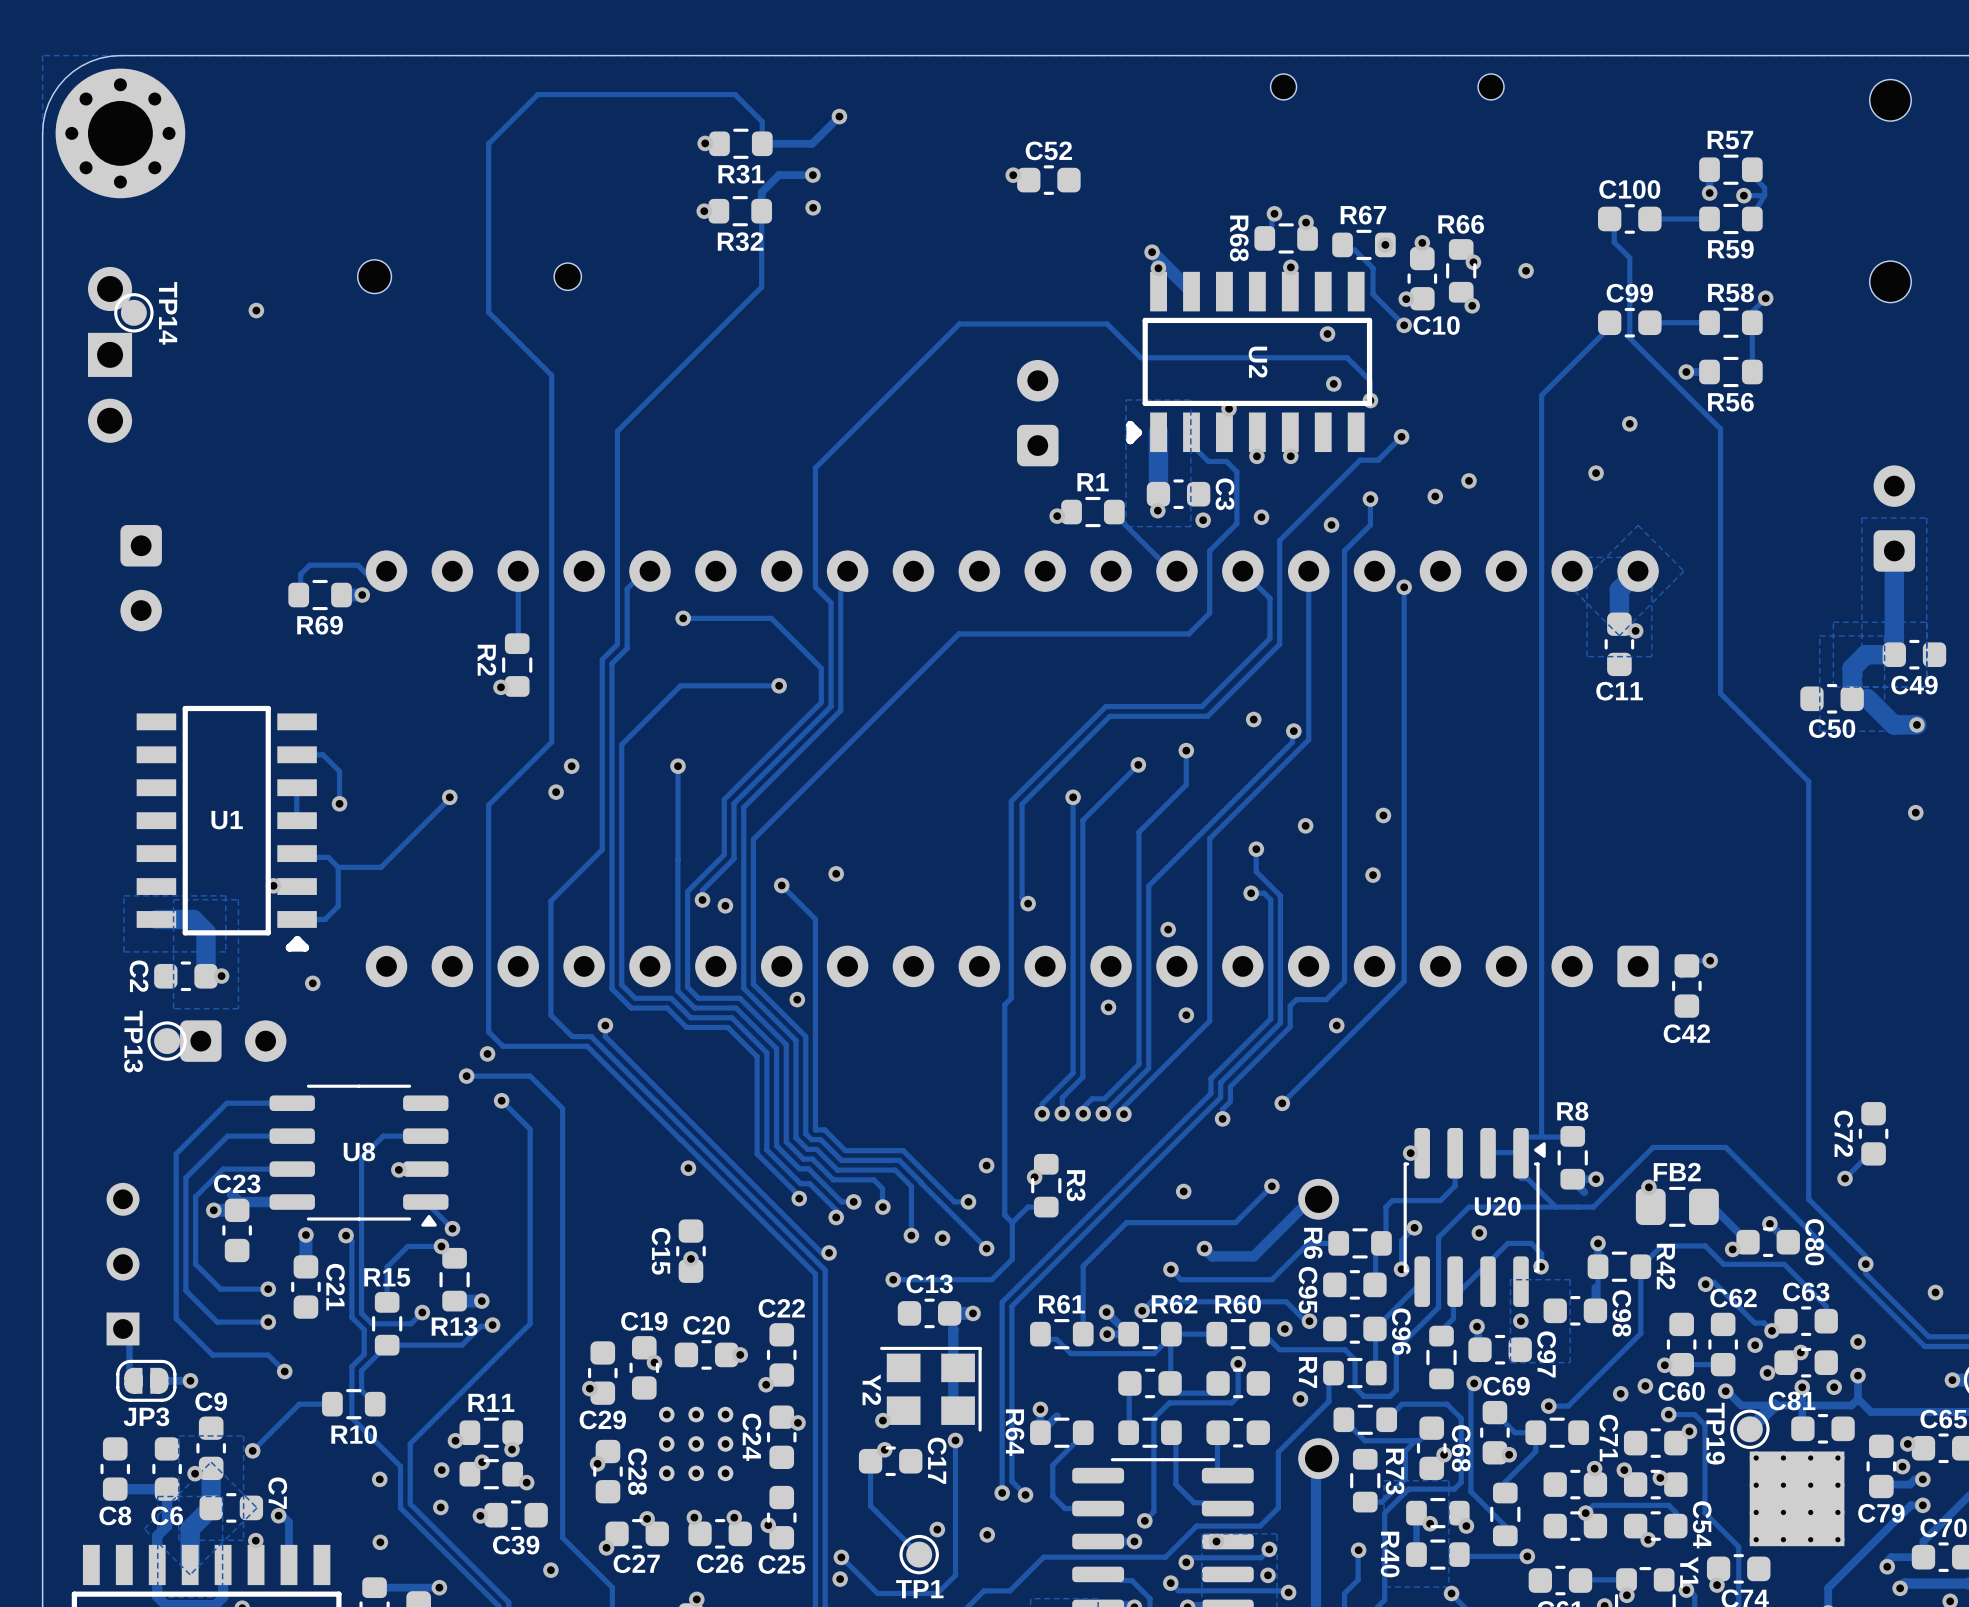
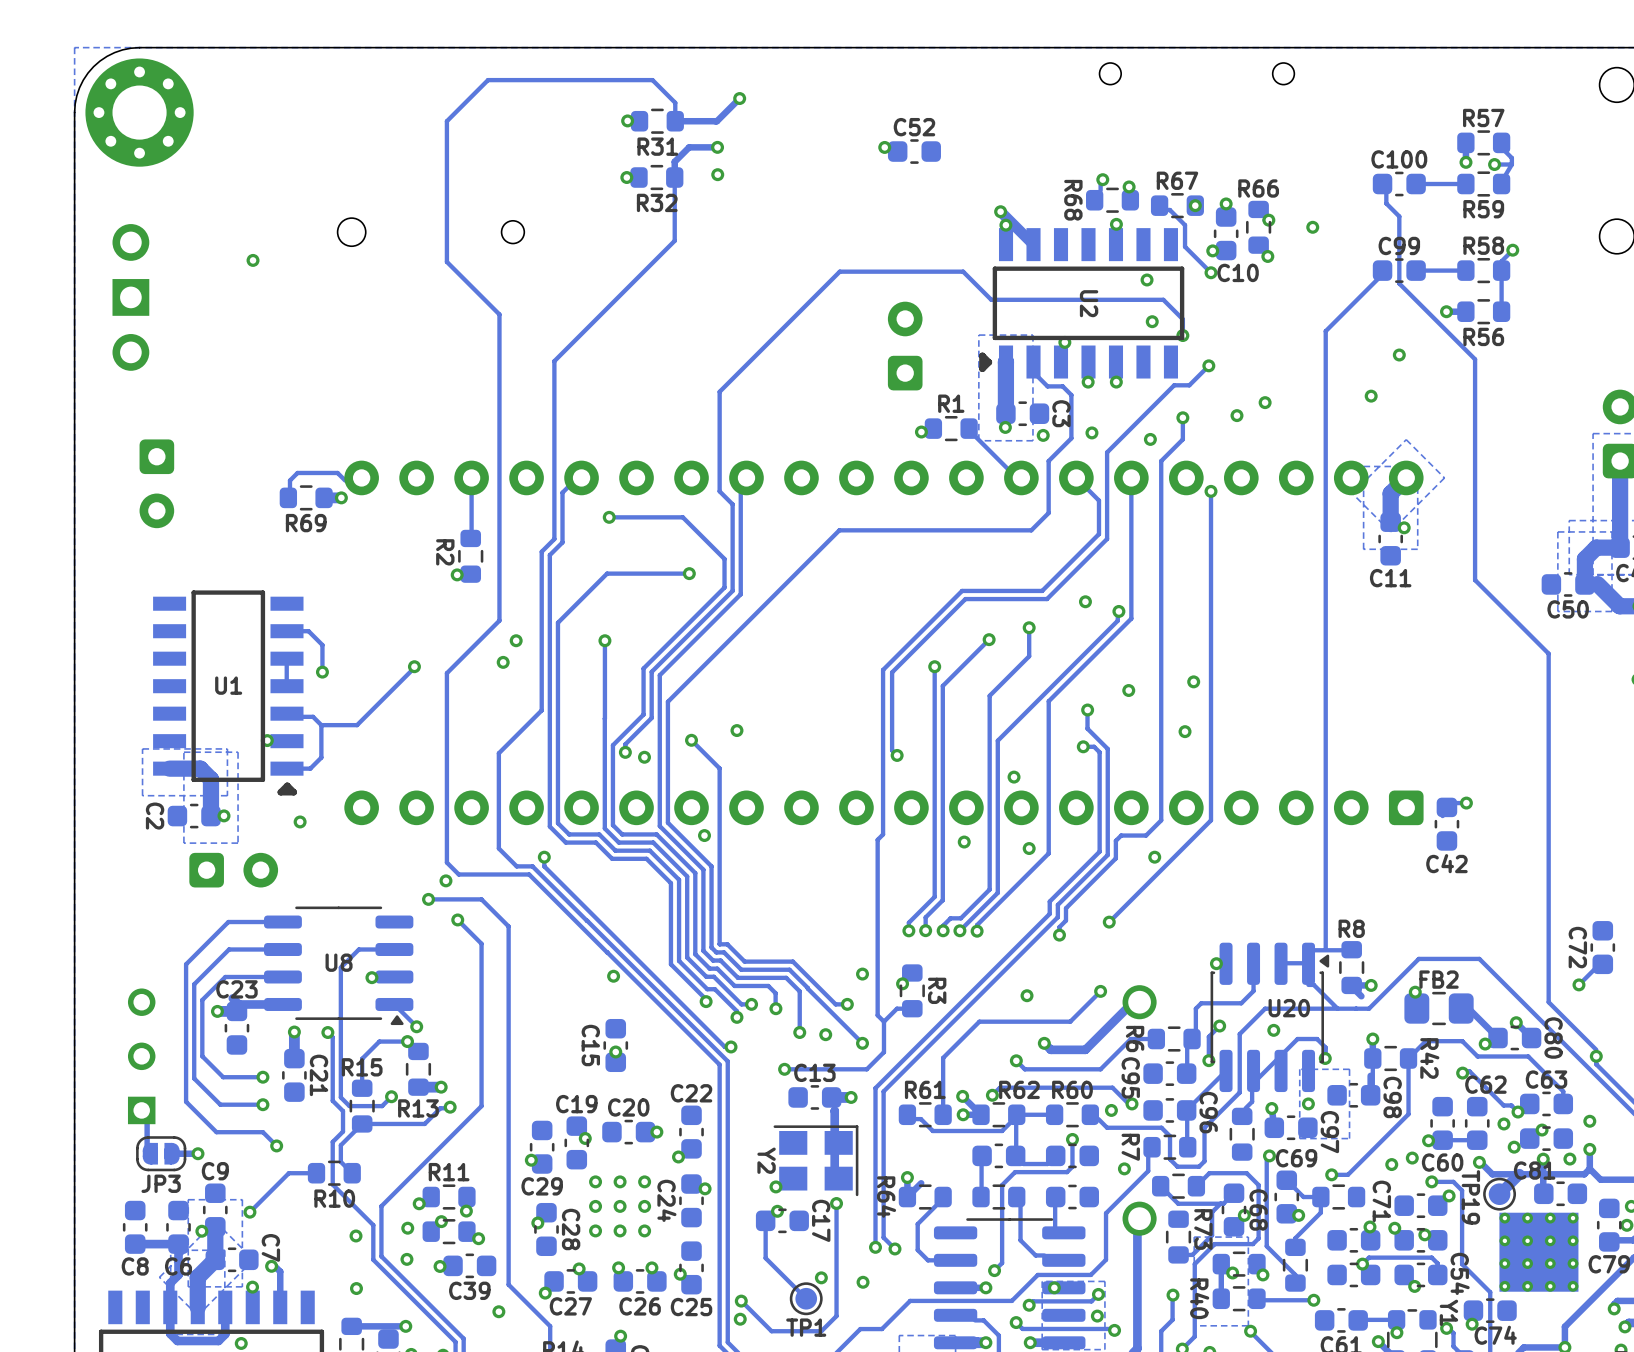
TP14: (133, 312) -> none
TP13: (167, 1041) -> none

